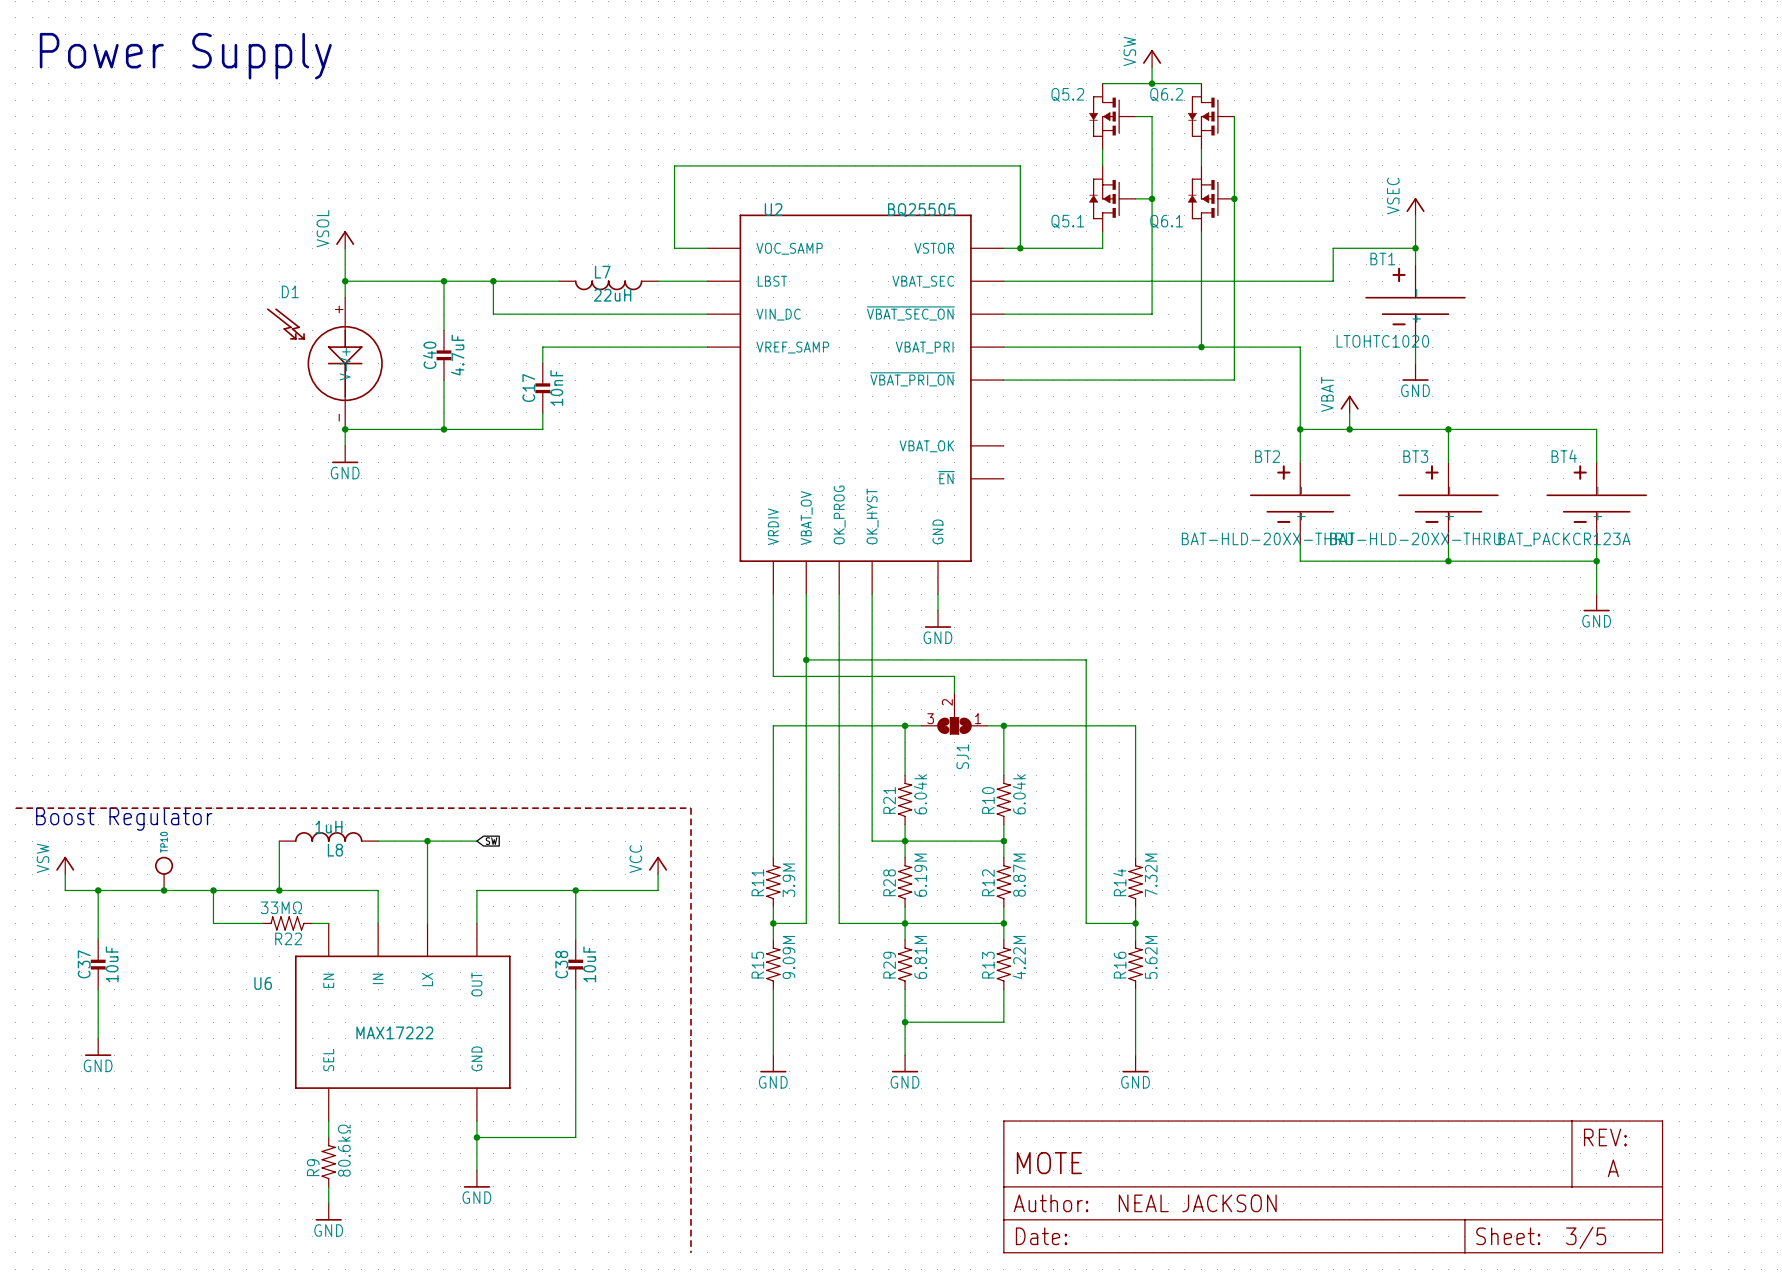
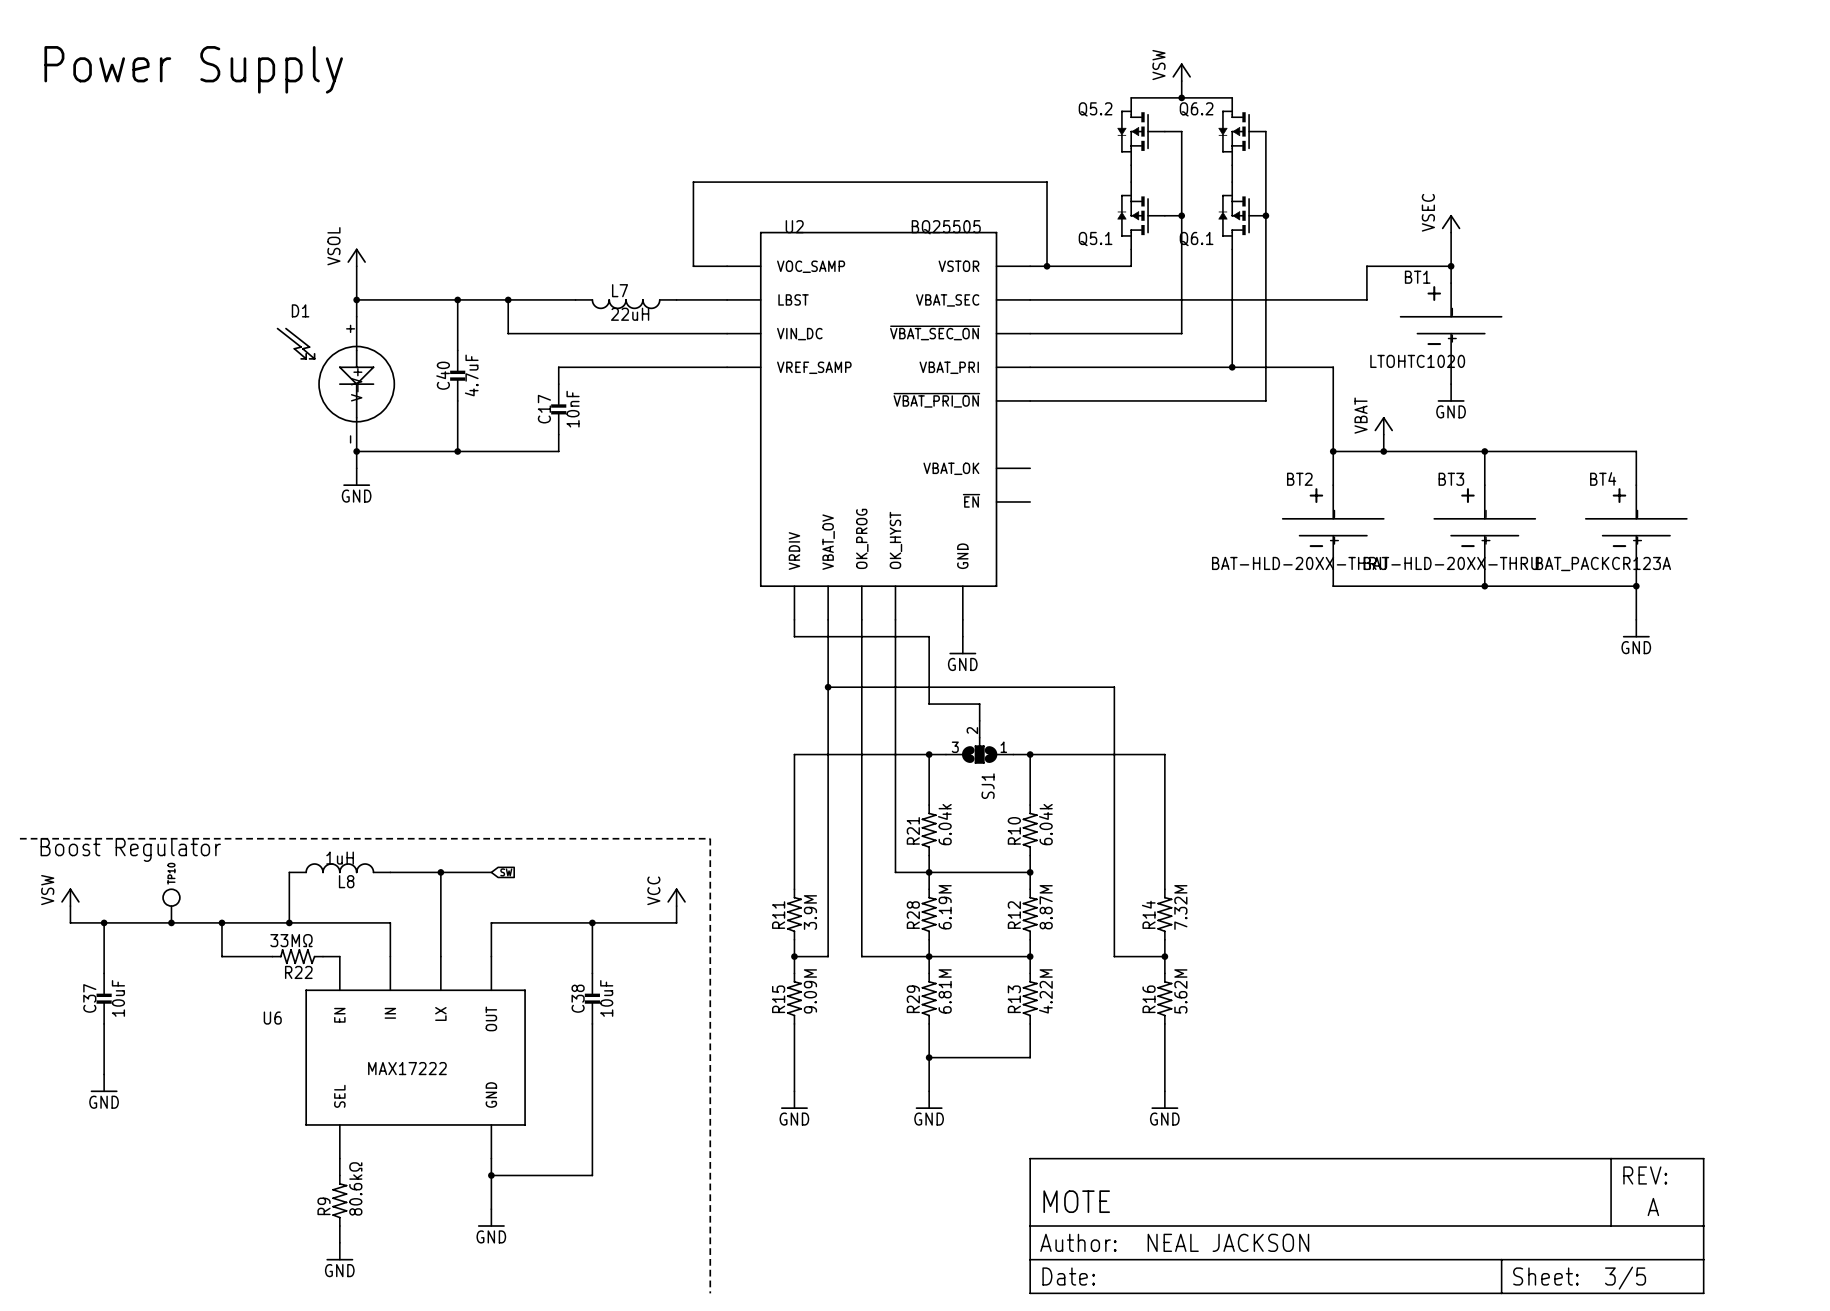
wire: (773, 610) (773, 676) (905, 676) -> (794, 636) (929, 636) (929, 704)

